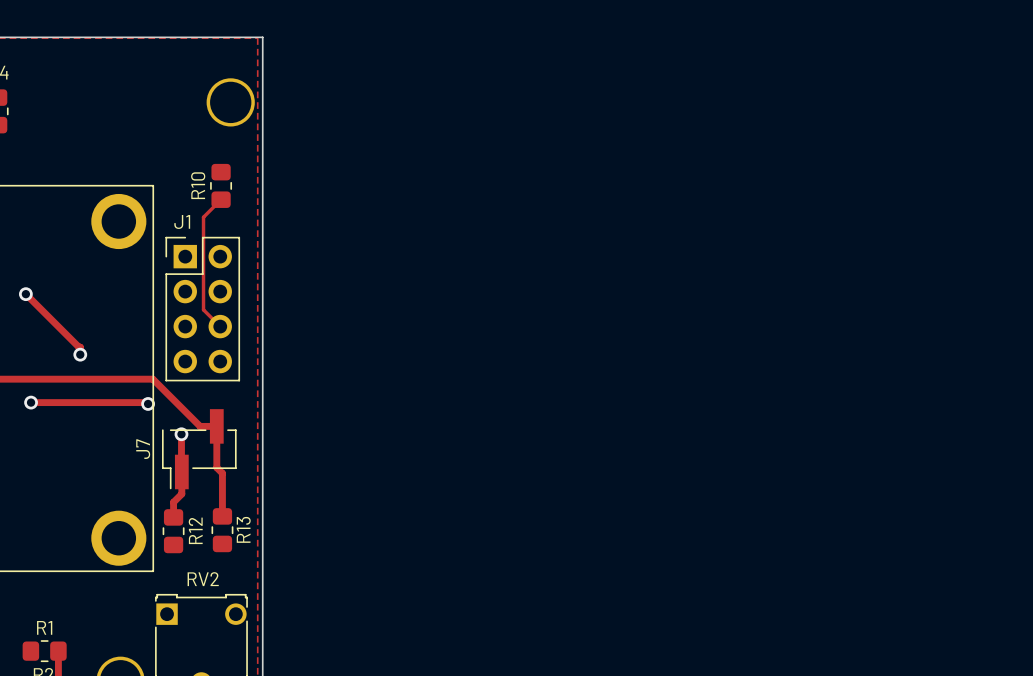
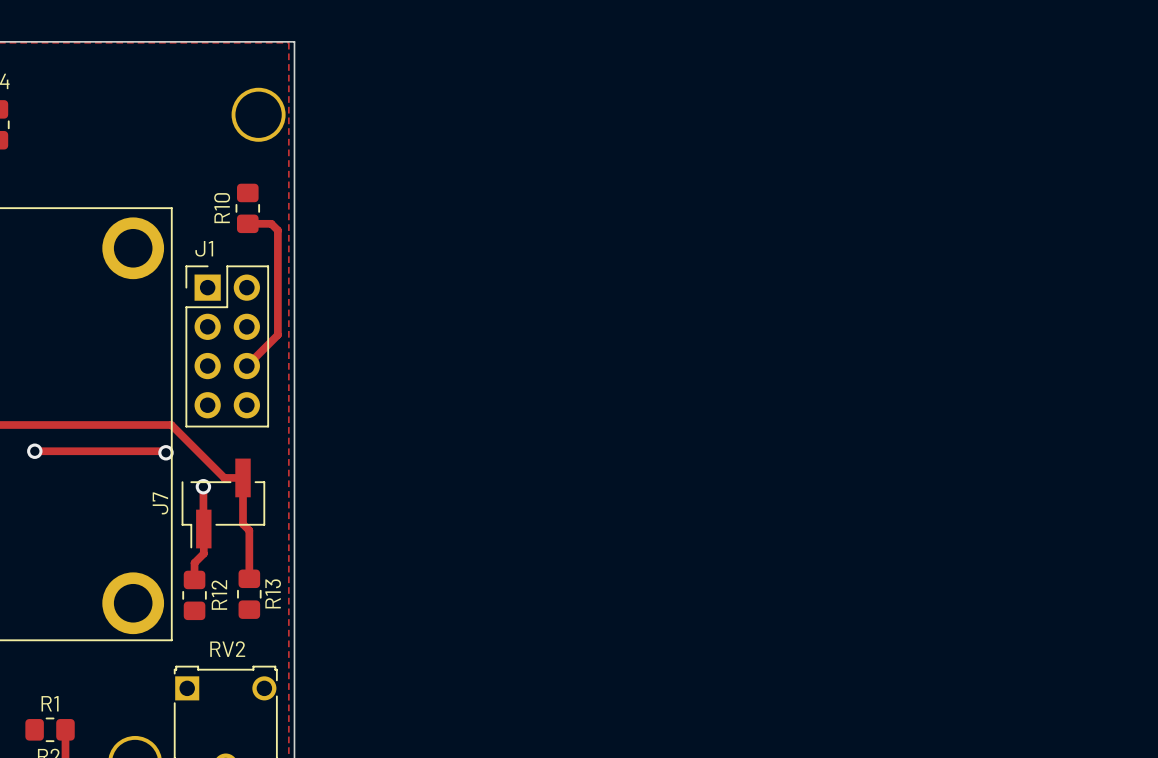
track: (221, 199) (203, 217) (203, 309) (220, 326) -> (247, 223) (271, 223) (277, 230) (277, 335) (246, 366)
track: (25, 293) (80, 347) (80, 354) -> none
via: (25, 294) -> none
via: (80, 354) -> none

